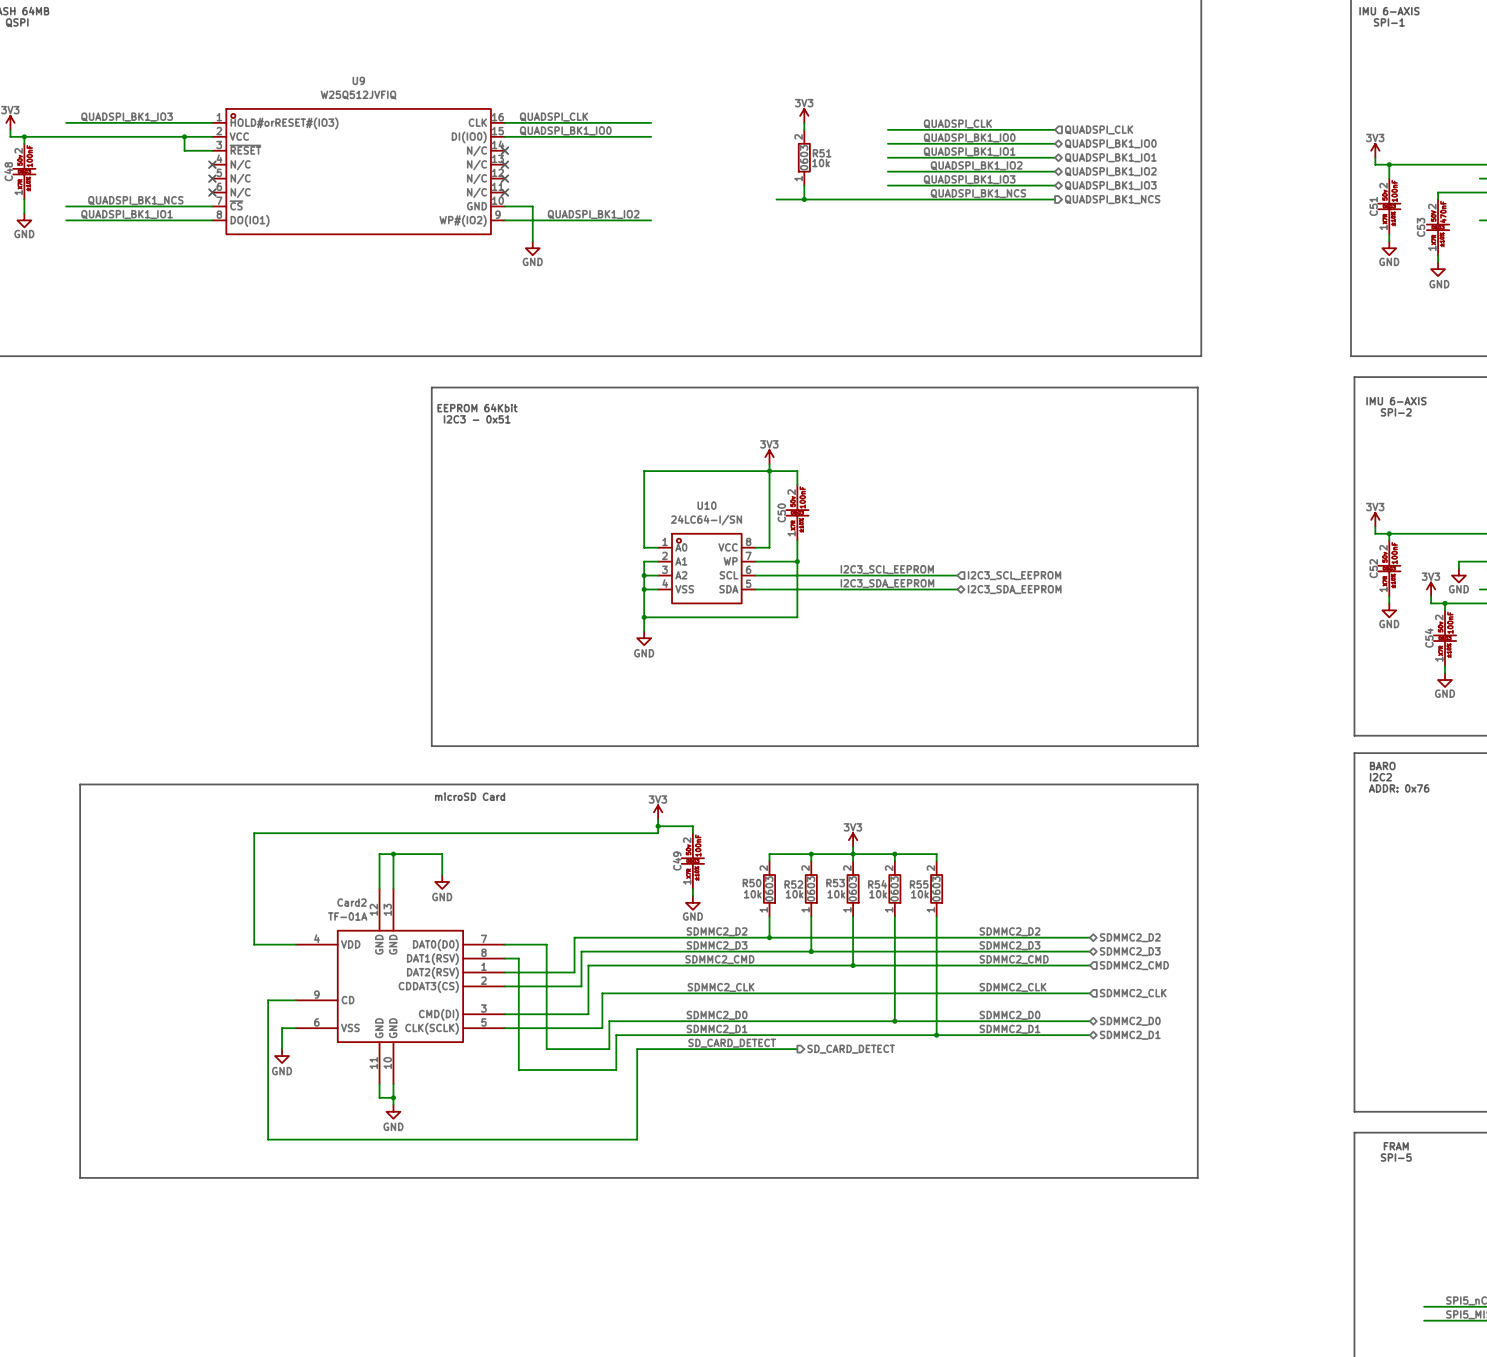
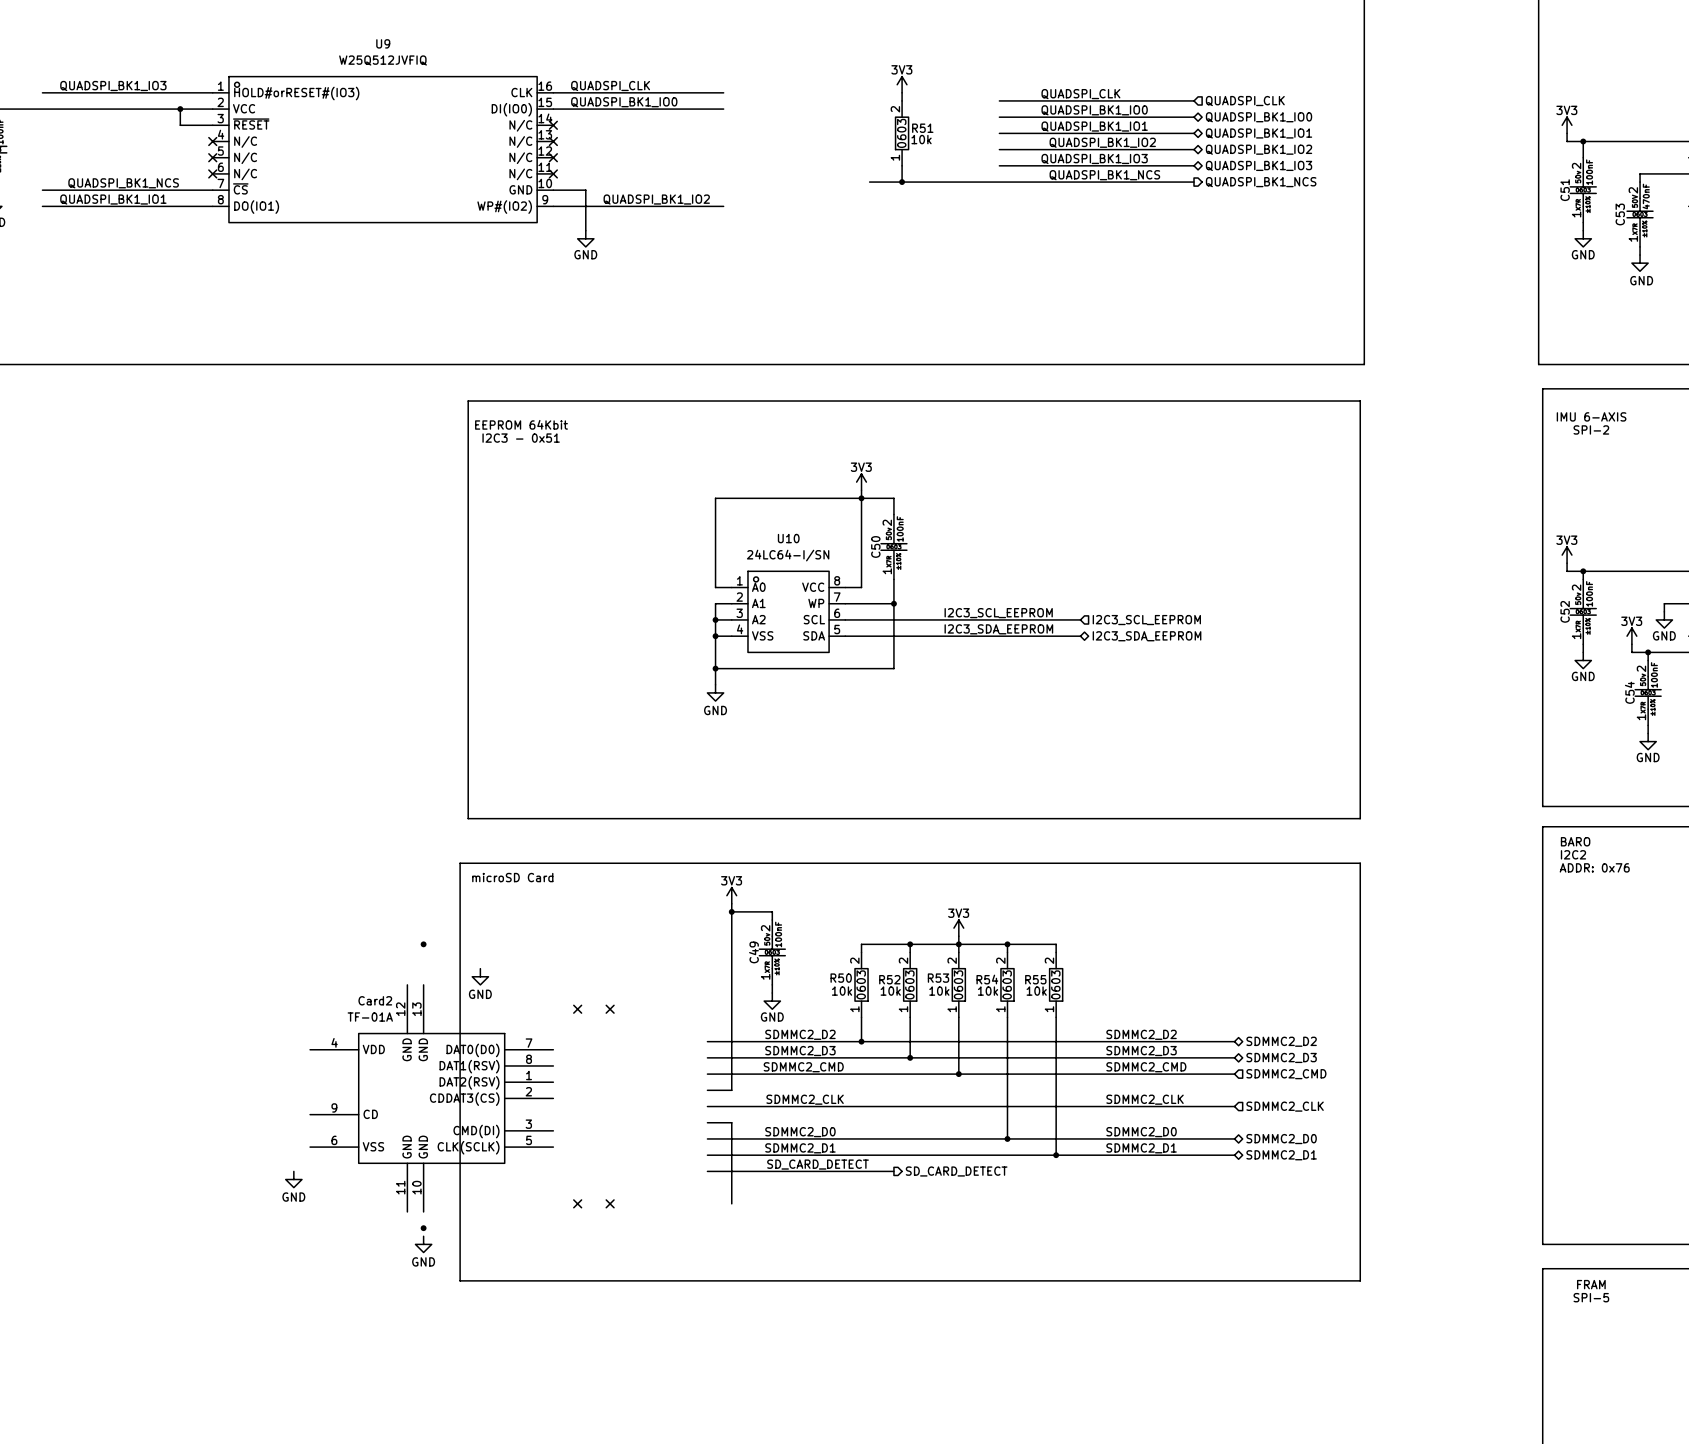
line: (424, 784) (80, 784) (80, 1177) (1197, 1177) (1197, 1143) -> (460, 863) (460, 1280) (1360, 1280)
wire: (658, 833) (254, 833) (254, 944) (295, 944) -> (731, 920) (731, 1090) (707, 1090)
wire: (393, 854) (393, 888) -> none
wire: (442, 875) (442, 854) (379, 854) (379, 888) -> none
no-connect mark: none -> (577, 1009)
no-connect mark: none -> (610, 1009)
wire: (637, 937) (574, 937) (574, 972) (504, 972) -> none
wire: (504, 944) (546, 944) (546, 1049) (609, 1049) (609, 1021) (637, 1021) -> none
wire: (637, 951) (581, 951) (581, 986) (504, 986) -> none
wire: (504, 958) (518, 958) (518, 1069) (616, 1069) (616, 1035) (637, 1035) -> none
wire: (637, 965) (588, 965) (588, 1014) (504, 1014) -> none
wire: (637, 993) (602, 993) (602, 1028) (504, 1028) -> none
wire: (295, 1000) (268, 1000) (268, 1139) (637, 1139) (637, 1049) -> none
wire: none -> (707, 1122) (731, 1122) (731, 1203)
wire: (295, 1028) (282, 1028) (282, 1049) -> none
no-connect mark: none -> (577, 1203)
no-connect mark: none -> (610, 1203)
wire: (379, 1083) (379, 1097) (393, 1097) -> none
wire: (393, 1083) (393, 1104) -> none

